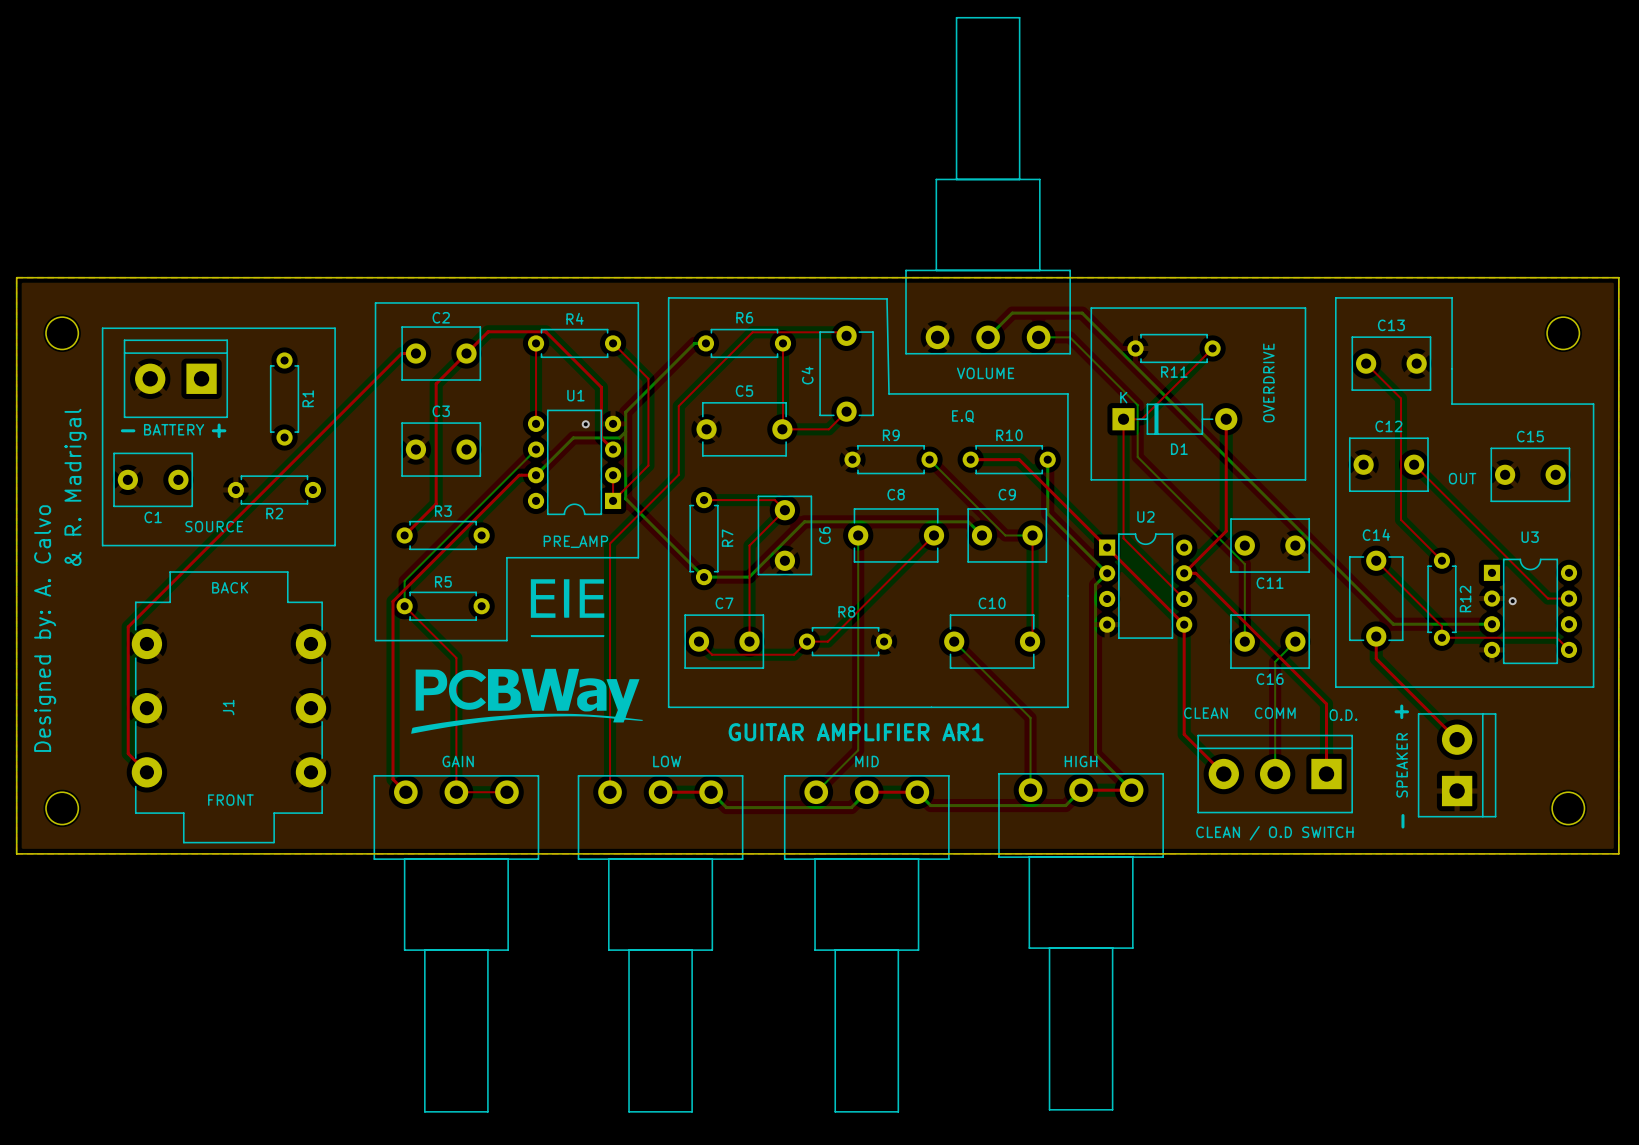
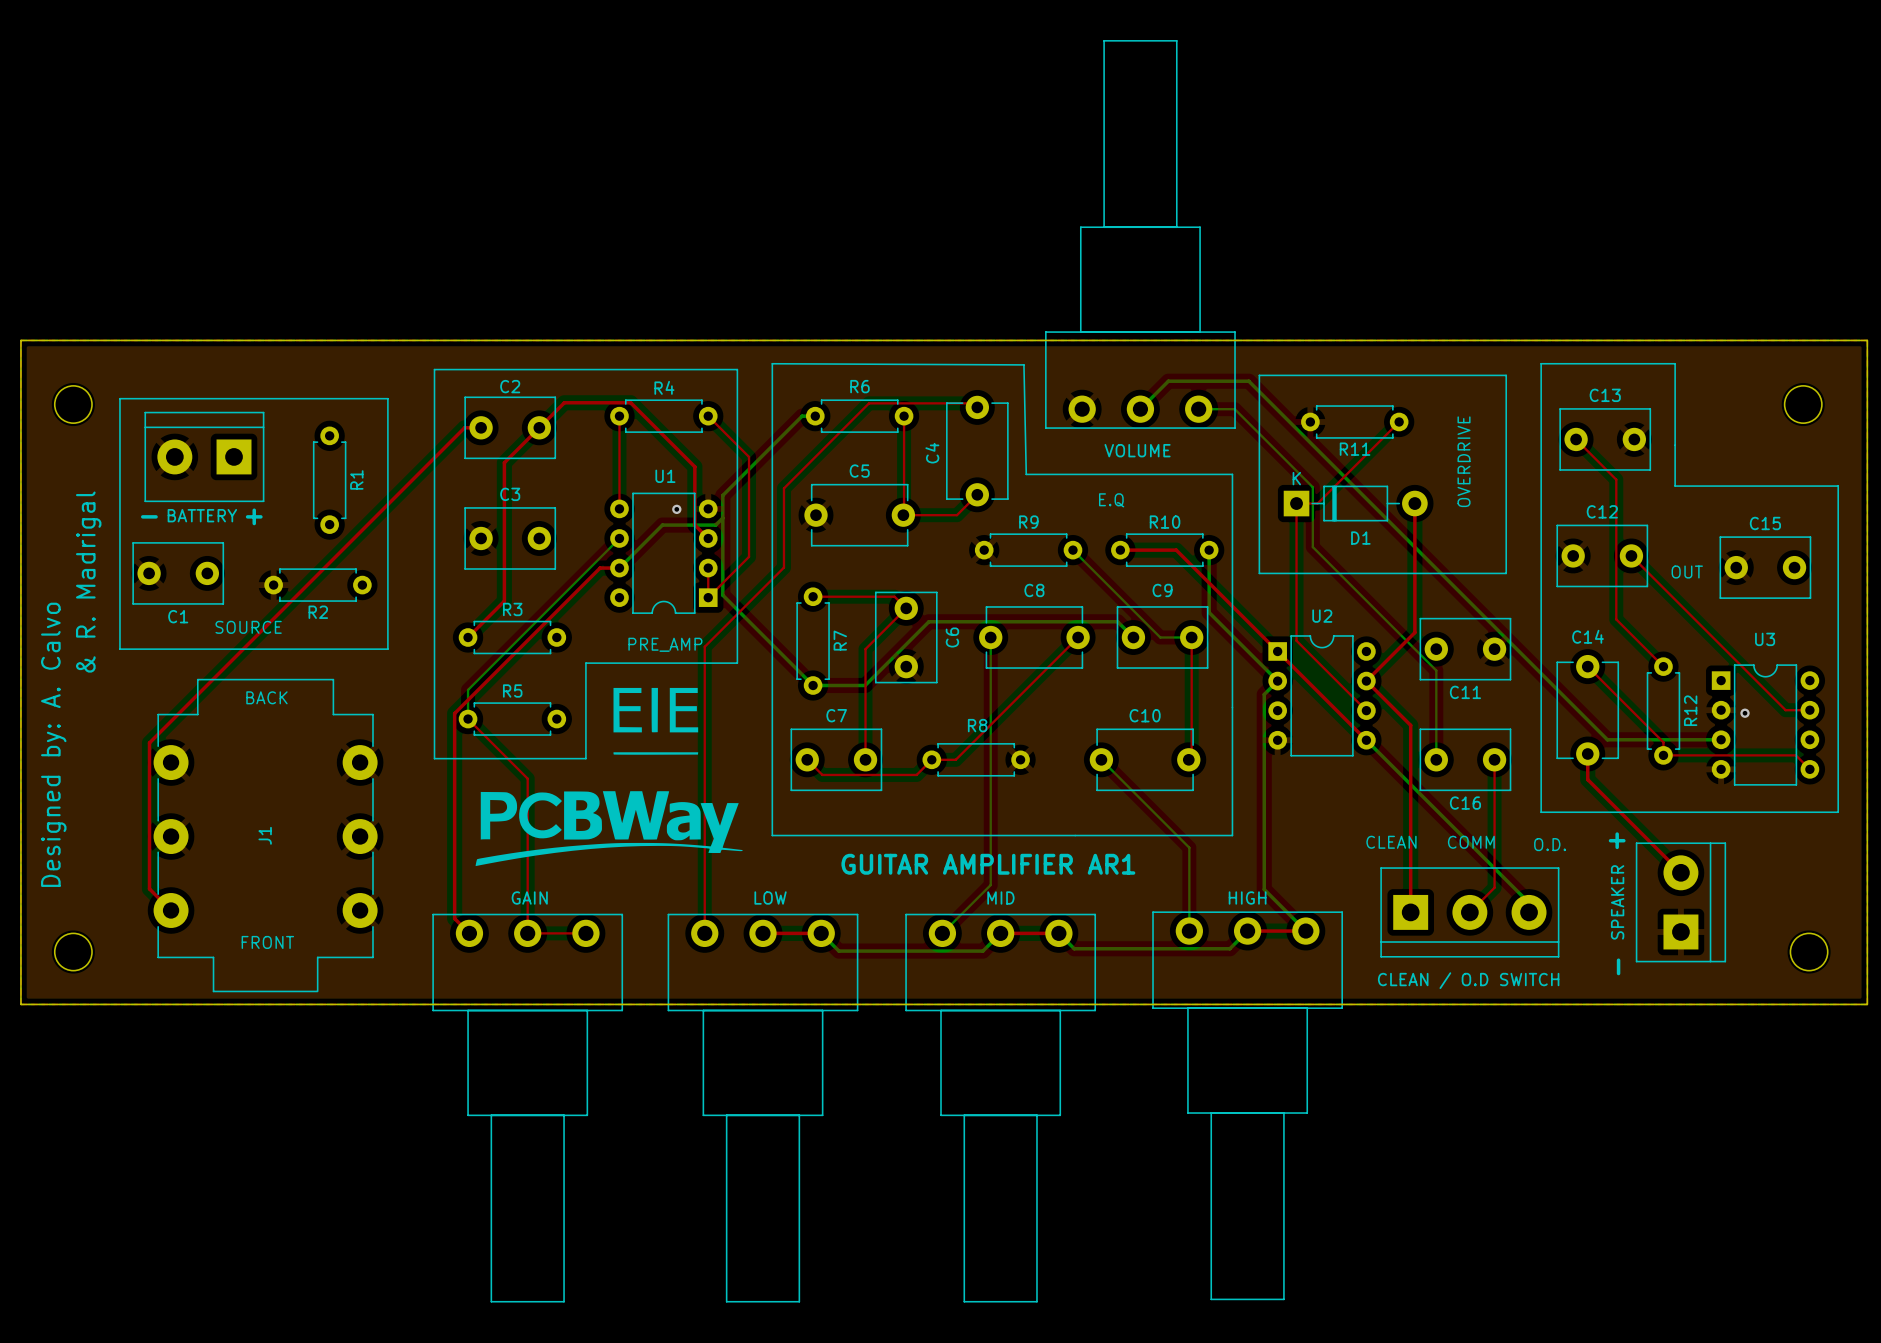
top track: (1184, 573) (1195, 573) (1326, 703) (1326, 774) -> (1366, 681) (1410, 725) (1410, 912)
top track: (1184, 624) (1184, 734) (1223, 774) -> none
bottom track: none -> (1366, 740) (1529, 902) (1529, 912)
top track: none -> (1494, 759) (1494, 887) (1469, 912)
bottom track: (1295, 641) (1275, 661) (1275, 774) -> none
CLEAN / O.D SWITCH rotation: 0° (1275, 774) -> 180° (1469, 912)

